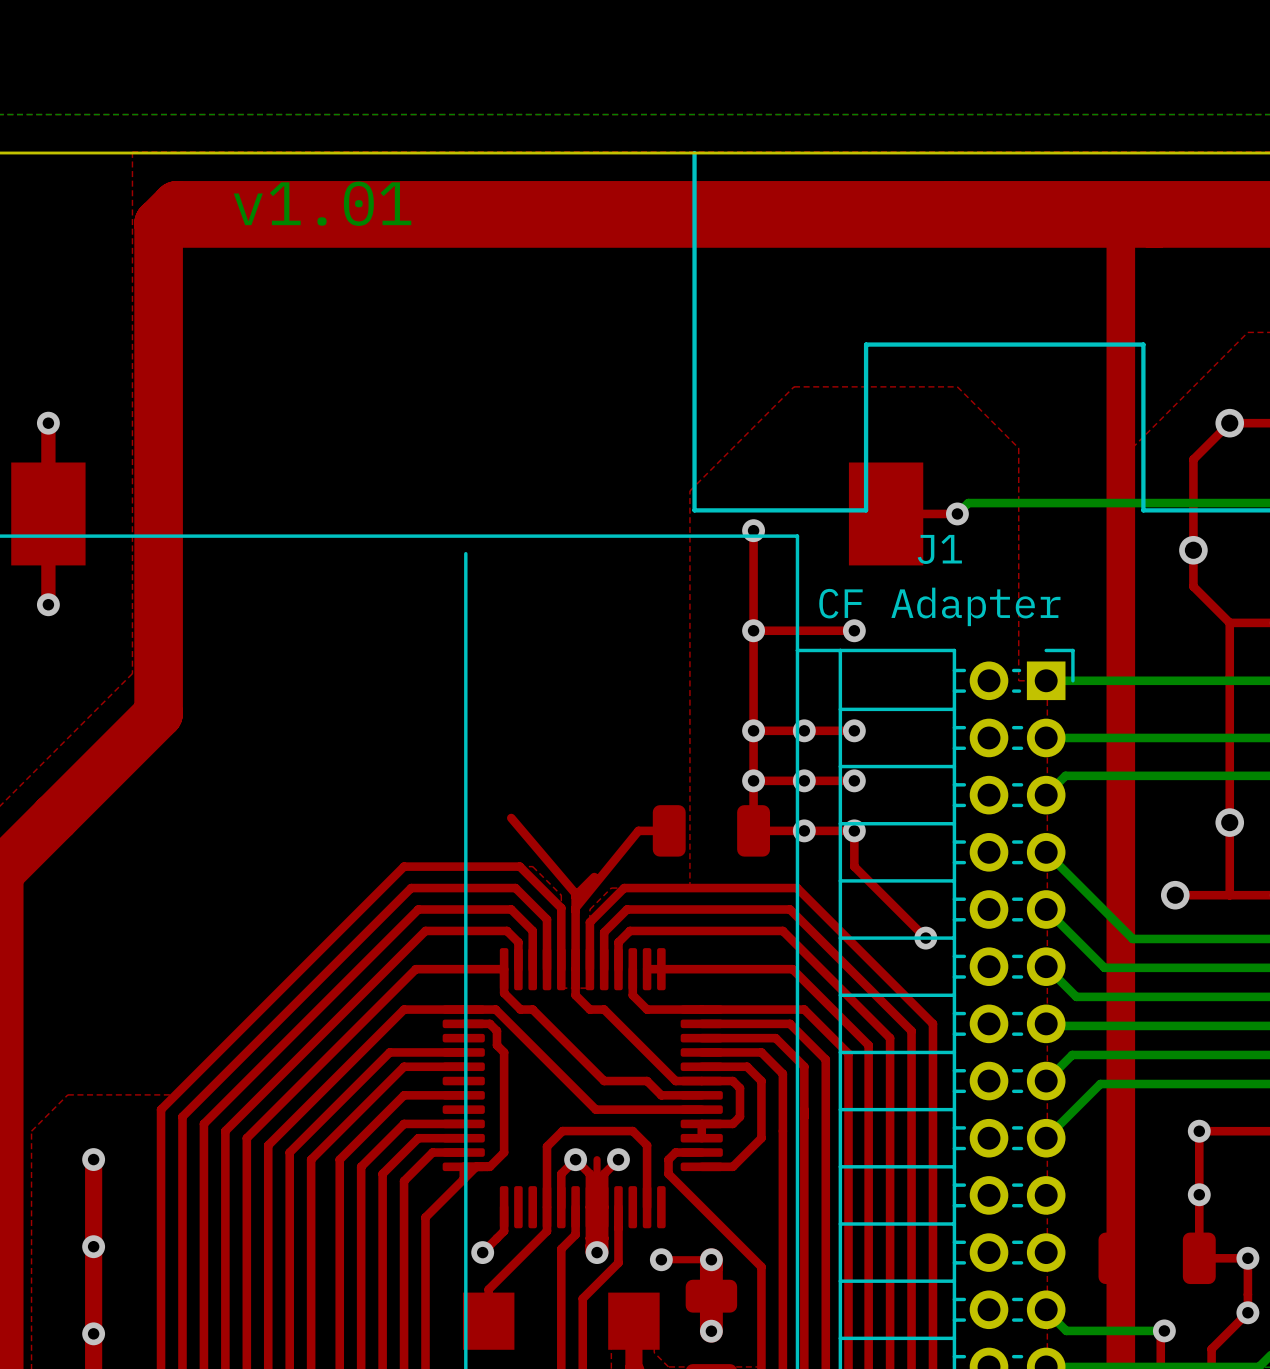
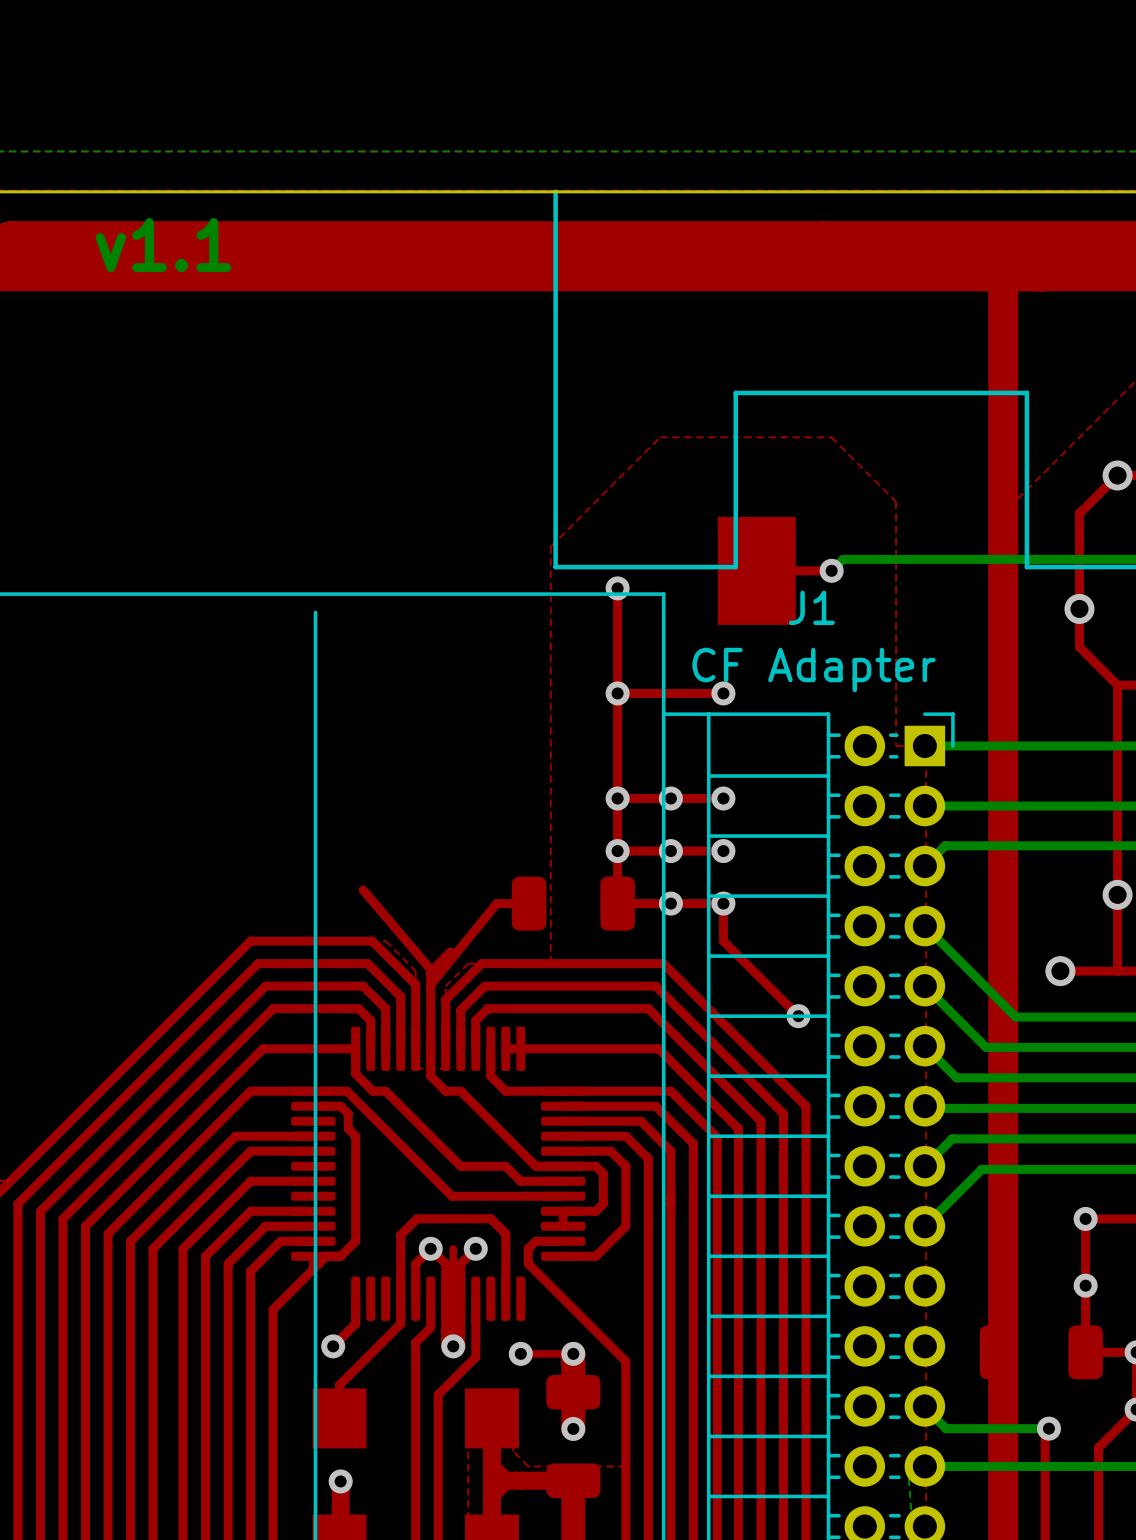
text: v1.01 (322, 203) -> v1.1 (163, 245)

